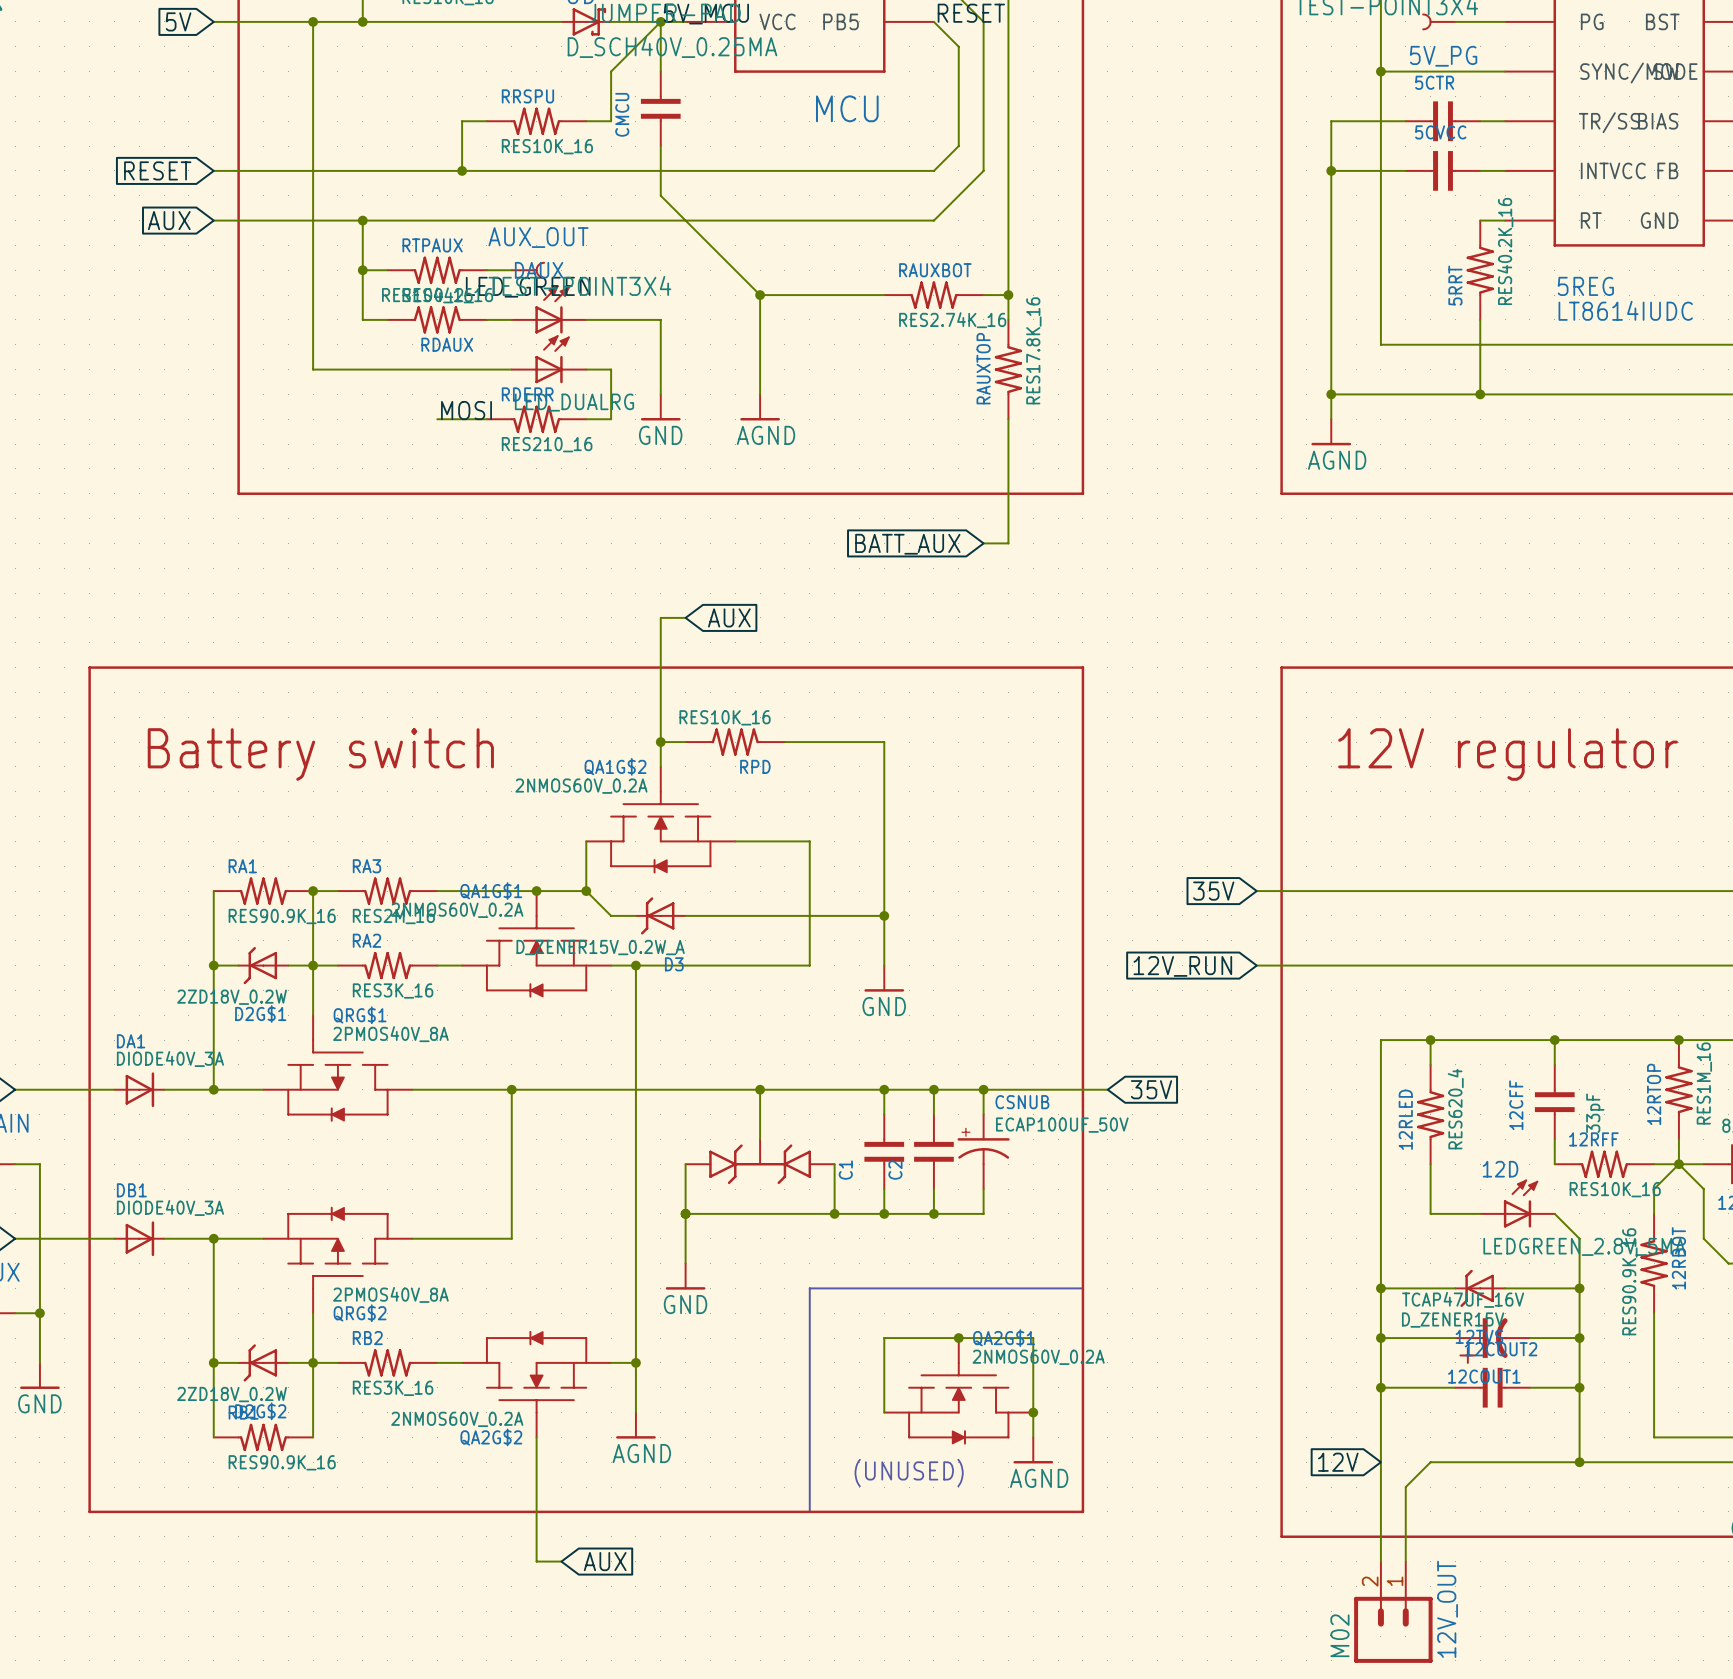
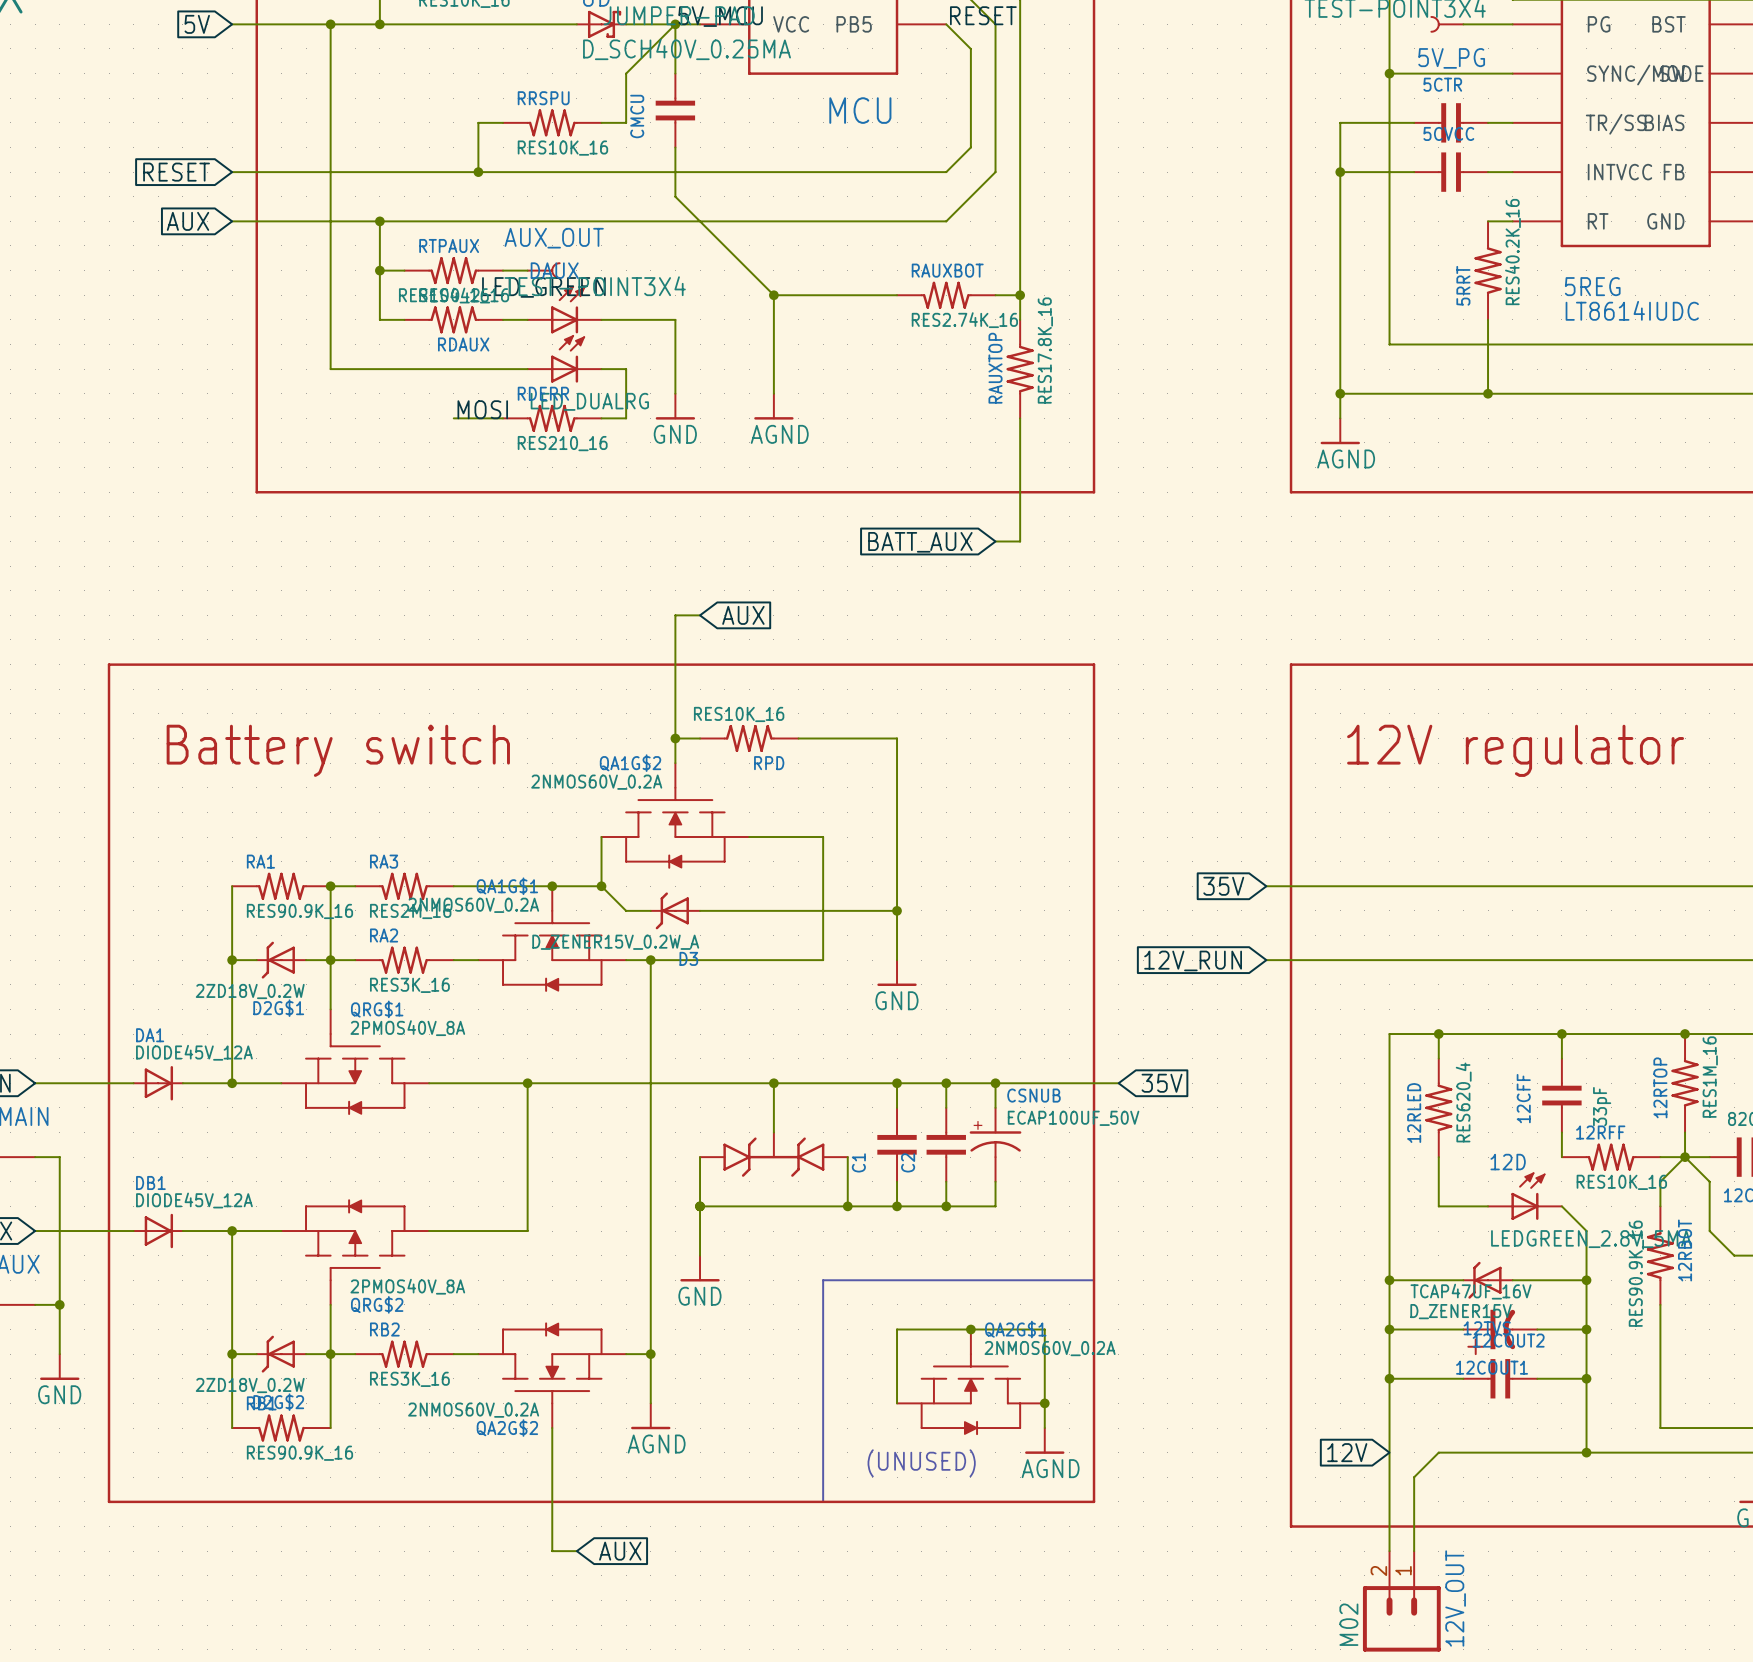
DA1 value: DIODE40V_3A (170, 1058) -> DIODE45V_12A (194, 1052)
DB1 value: DIODE40V_3A (170, 1207) -> DIODE45V_12A (194, 1200)

